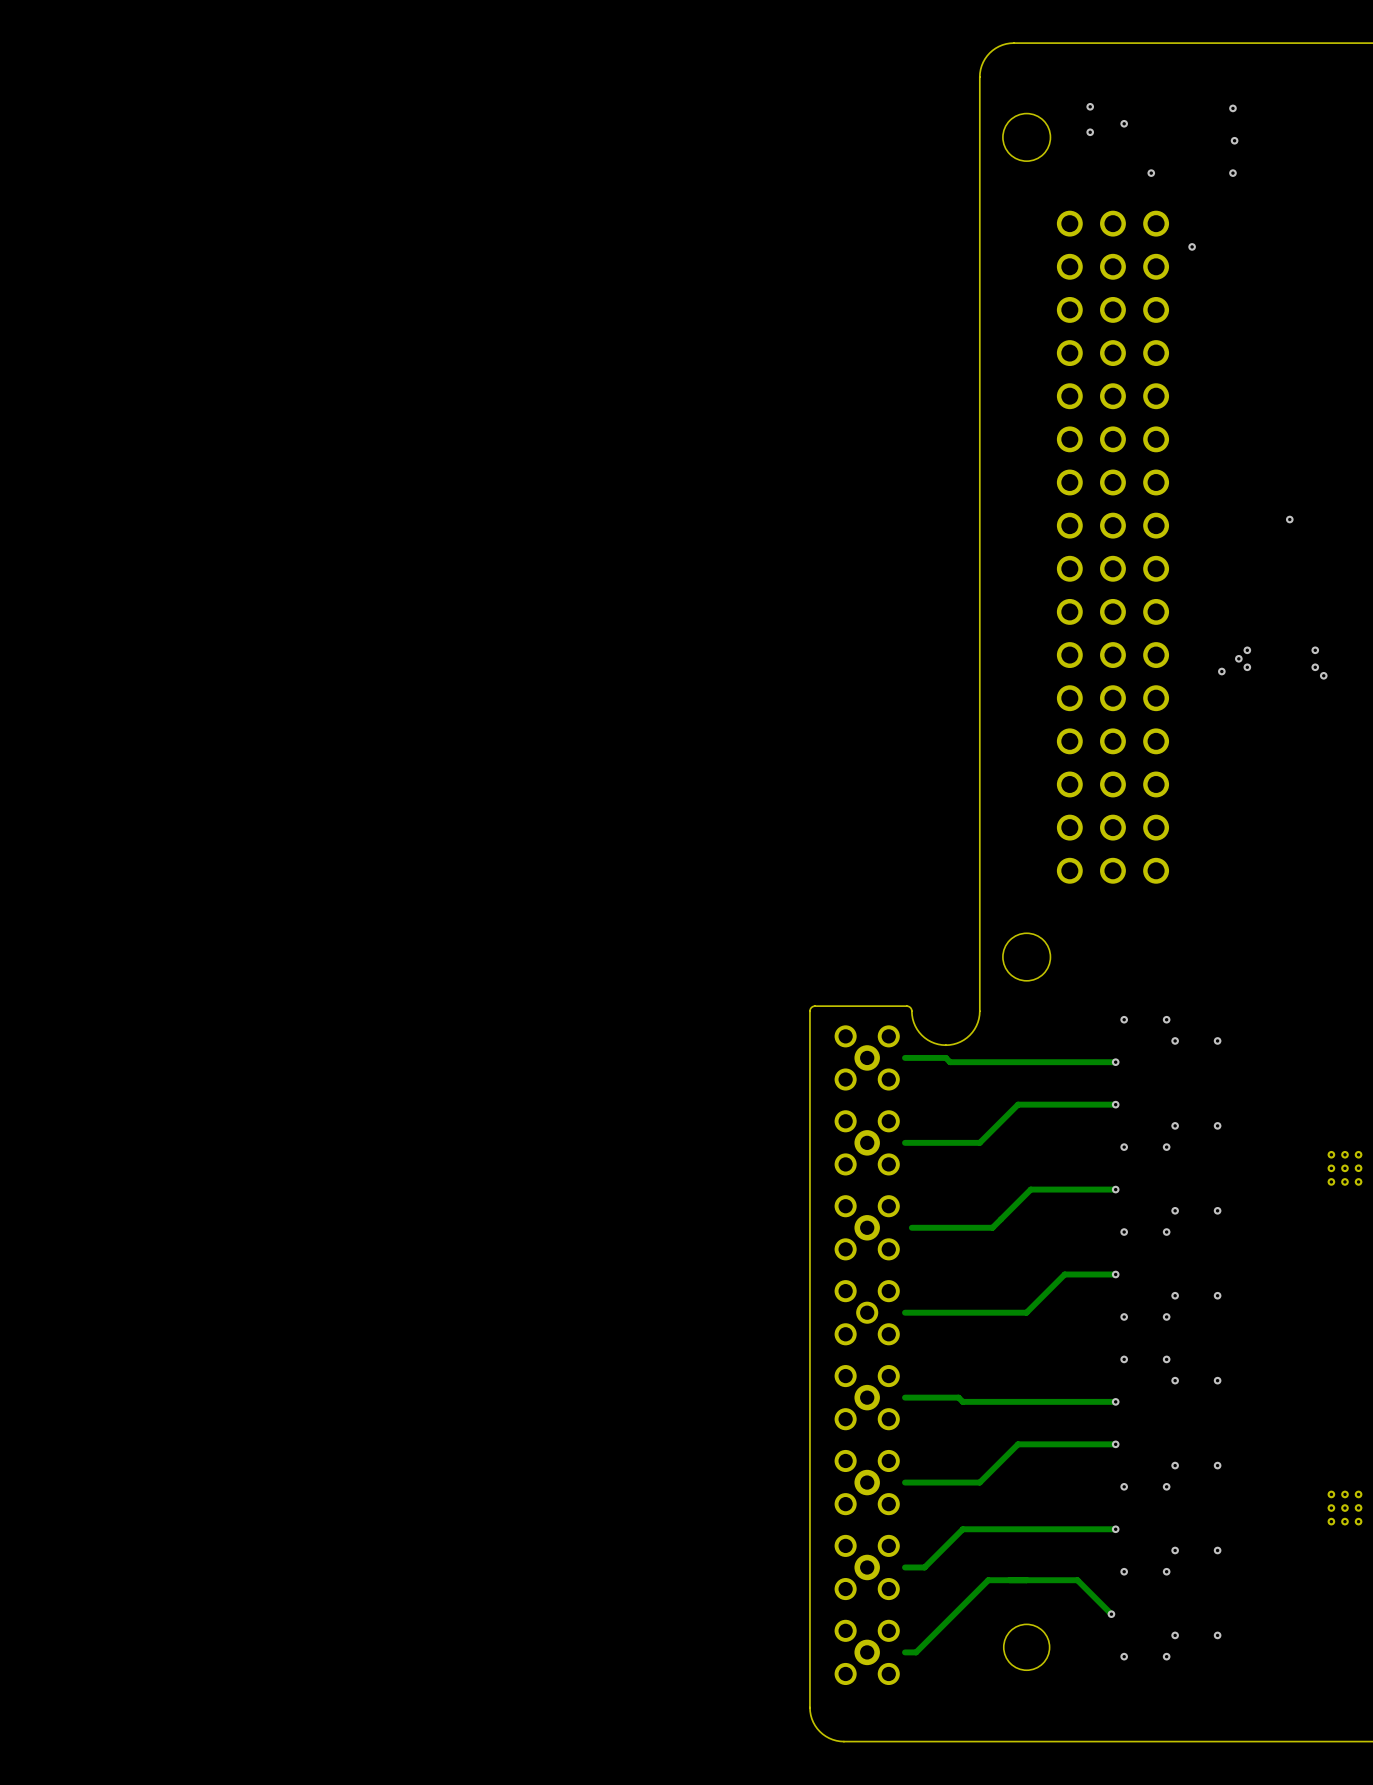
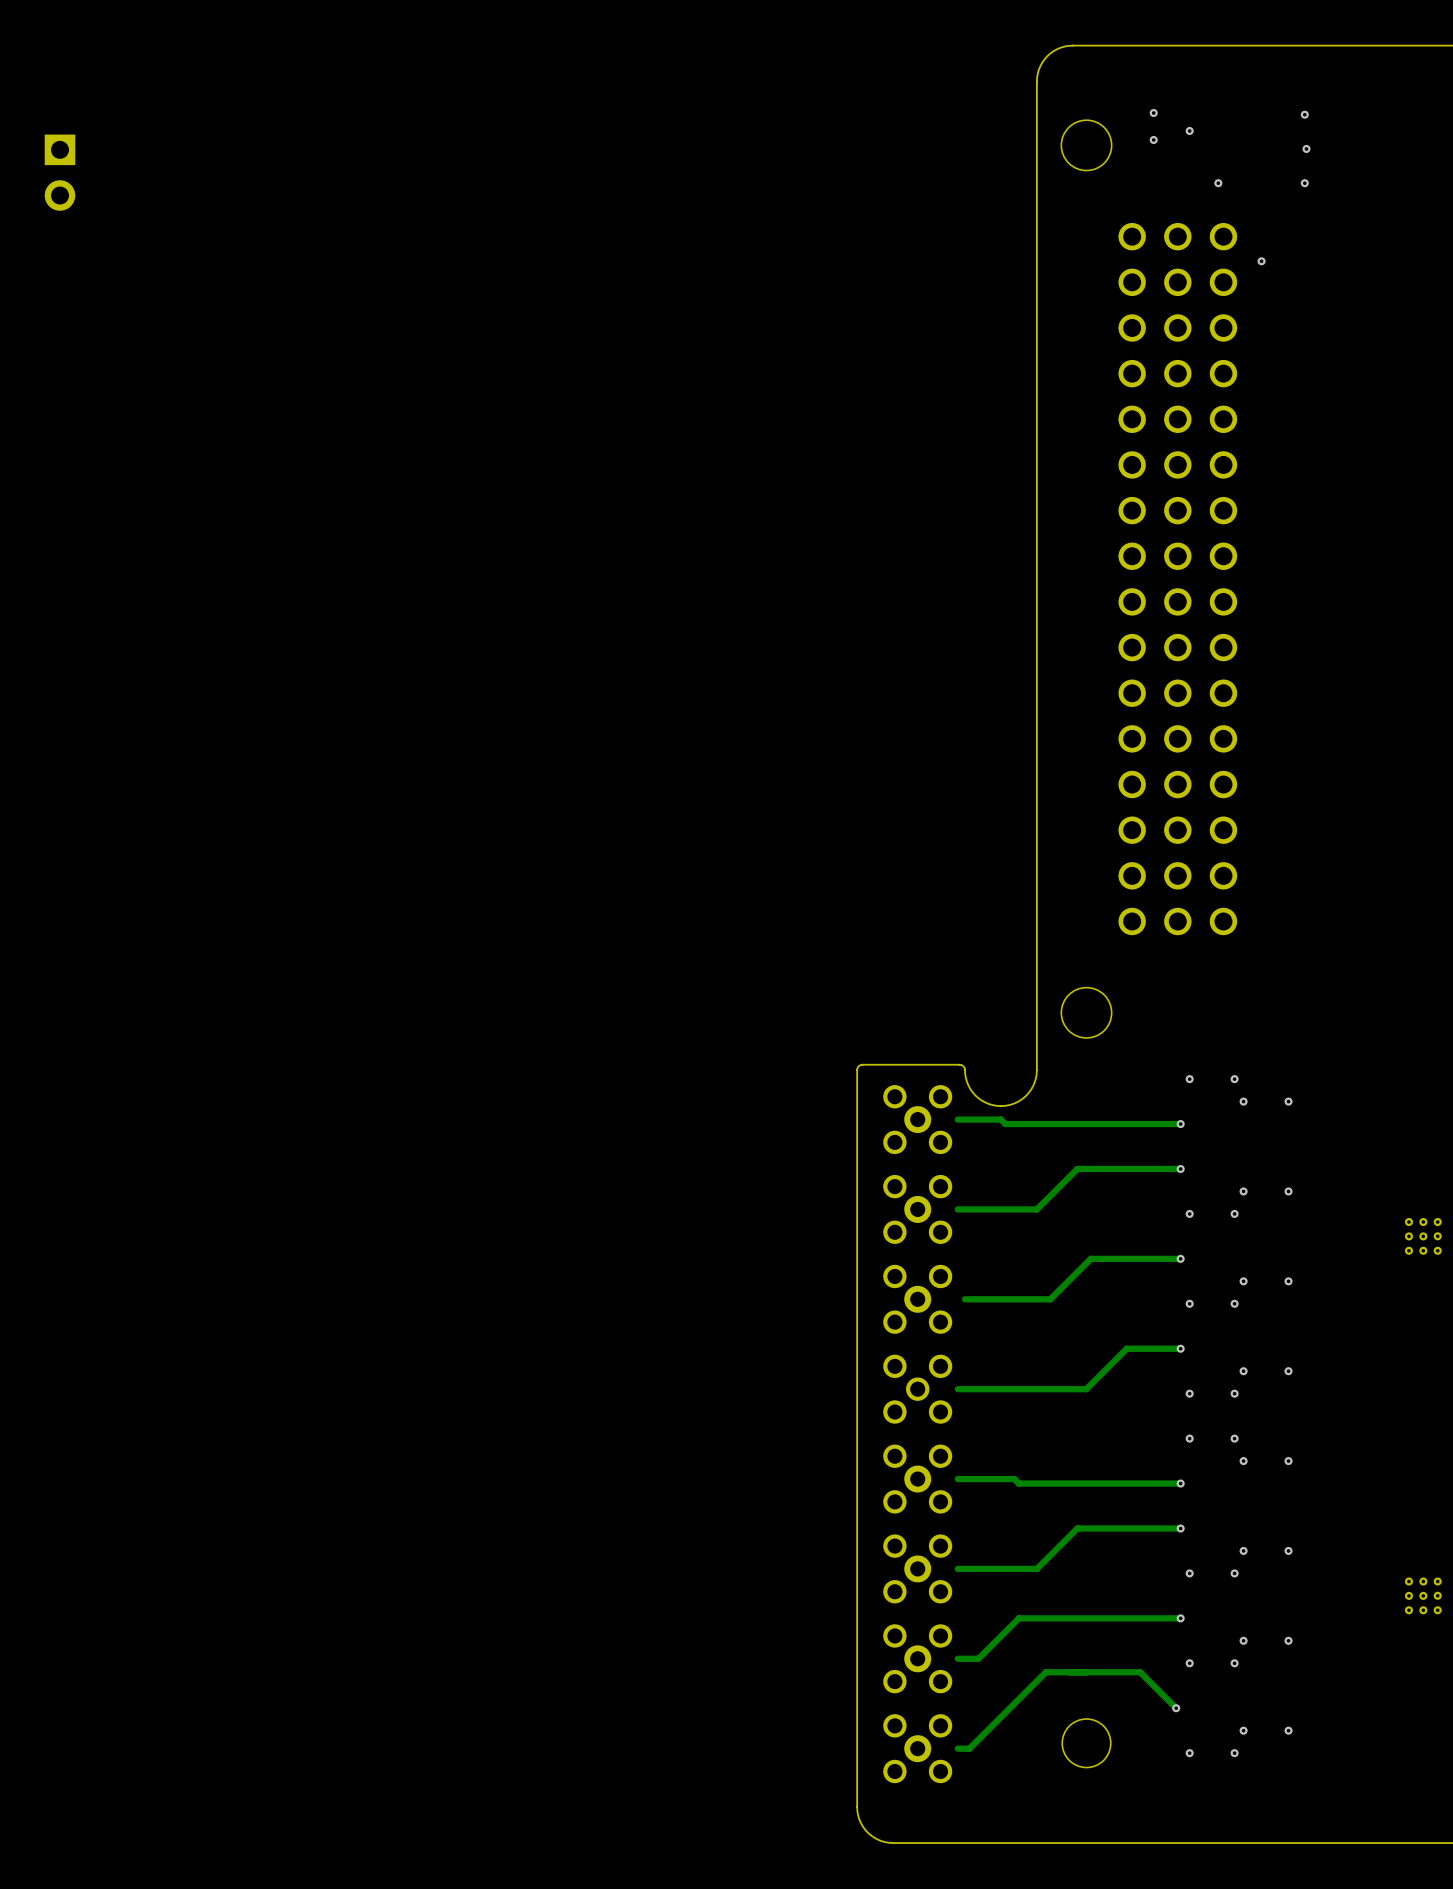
part: none -> (59, 172)
via: (1289, 519) -> none
via: (1247, 650) -> none
via: (1315, 650) -> none
via: (1238, 658) -> none
via: (1247, 667) -> none
via: (1315, 667) -> none
via: (1221, 671) -> none
via: (1323, 675) -> none

